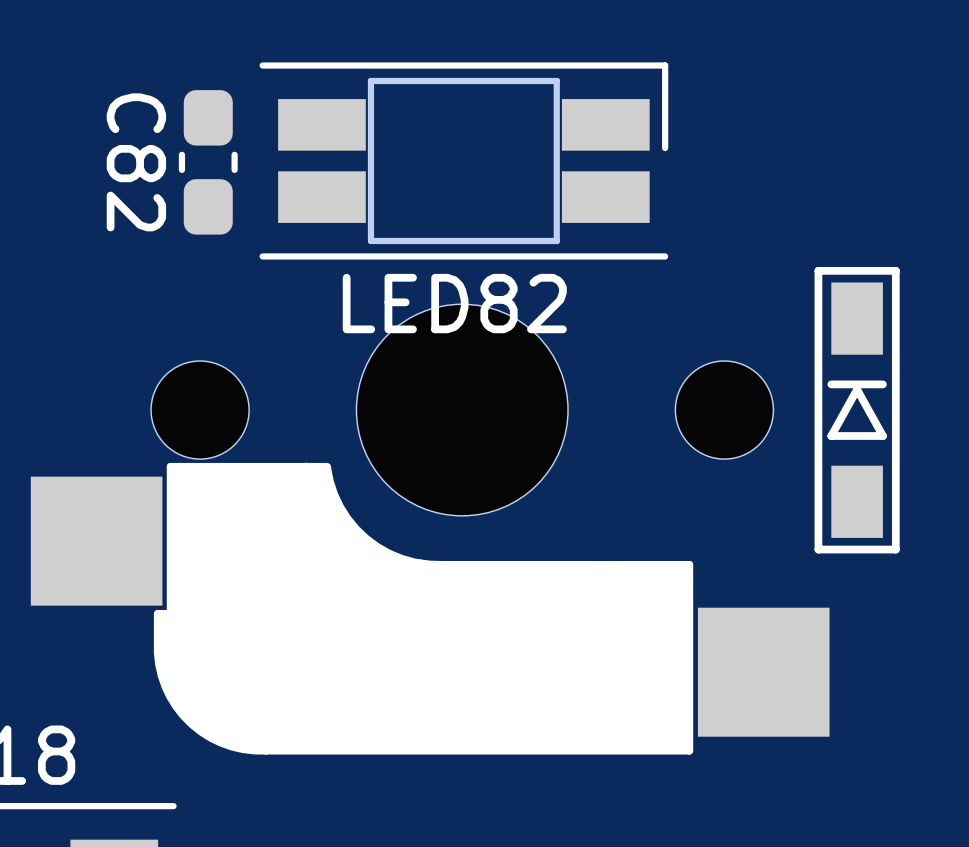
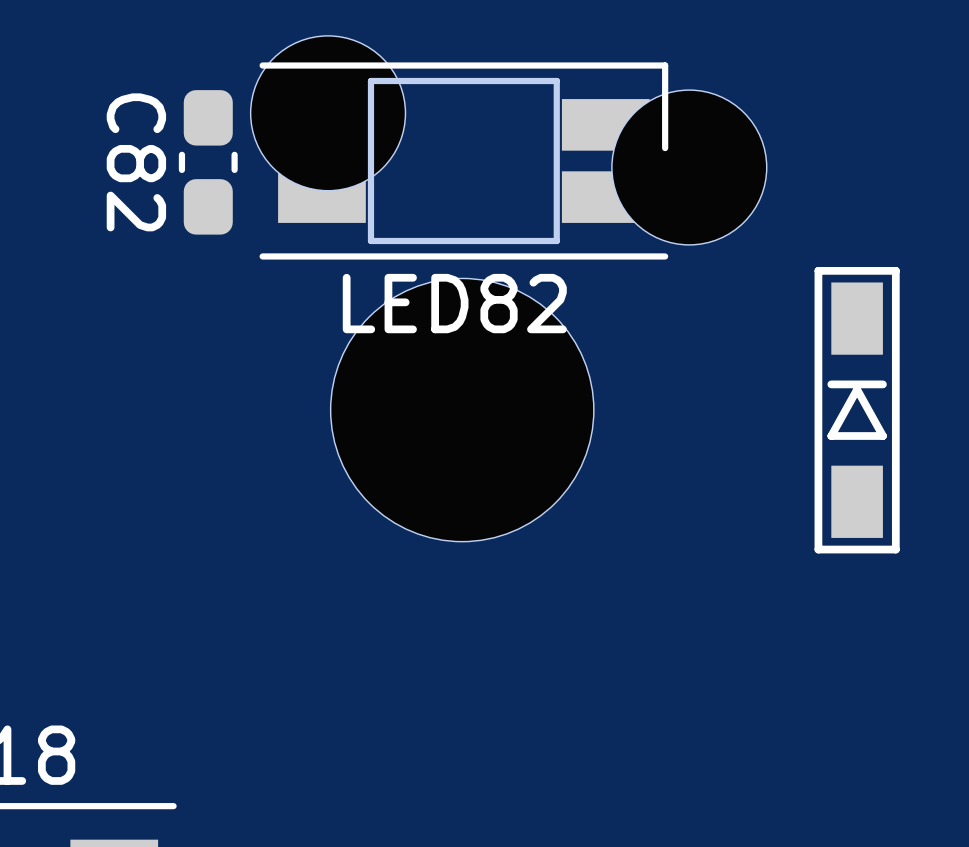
part: none -> (508, 288)
part: (430, 529) -> none

